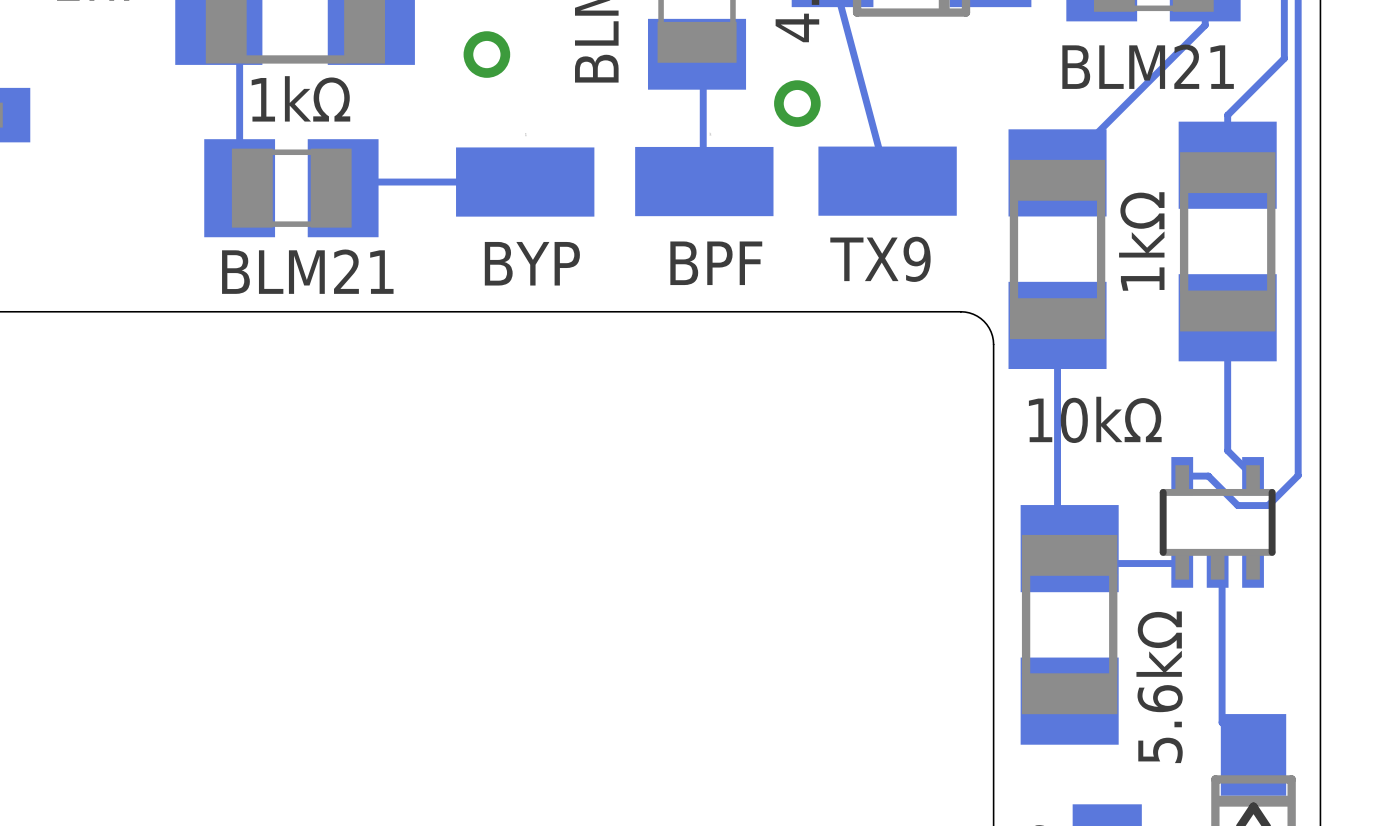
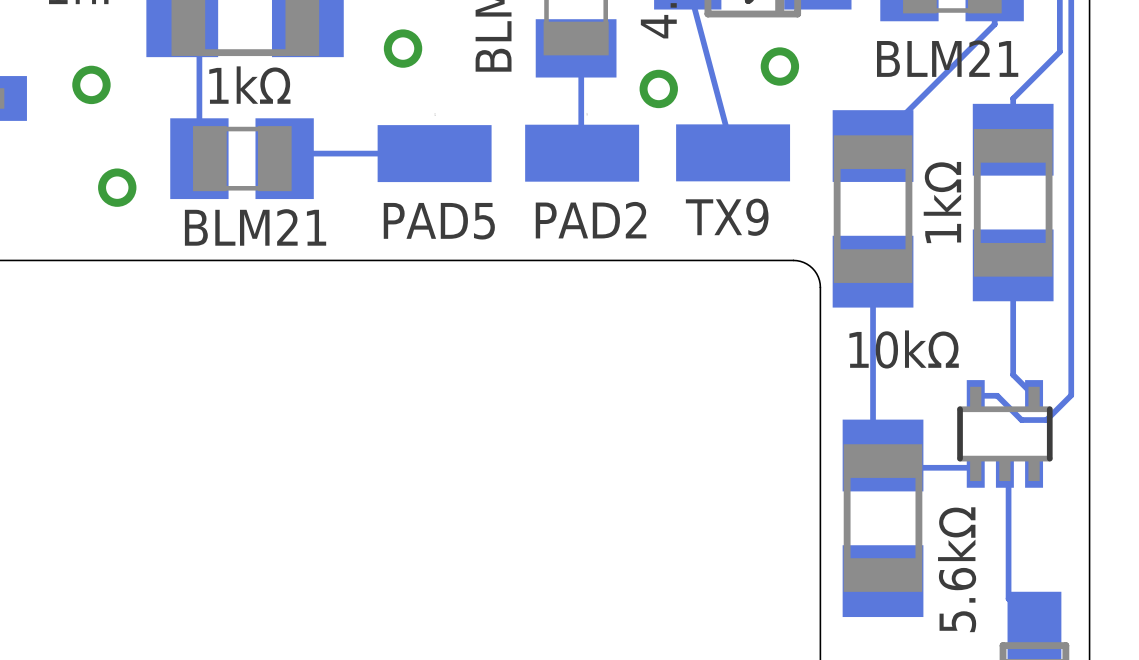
via: none -> (779, 66)
via: none -> (91, 84)
via: none -> (117, 187)
BYP name: BYP (532, 263) -> PAD5 (439, 221)
BPF name: BPF (716, 263) -> PAD2 (591, 220)

